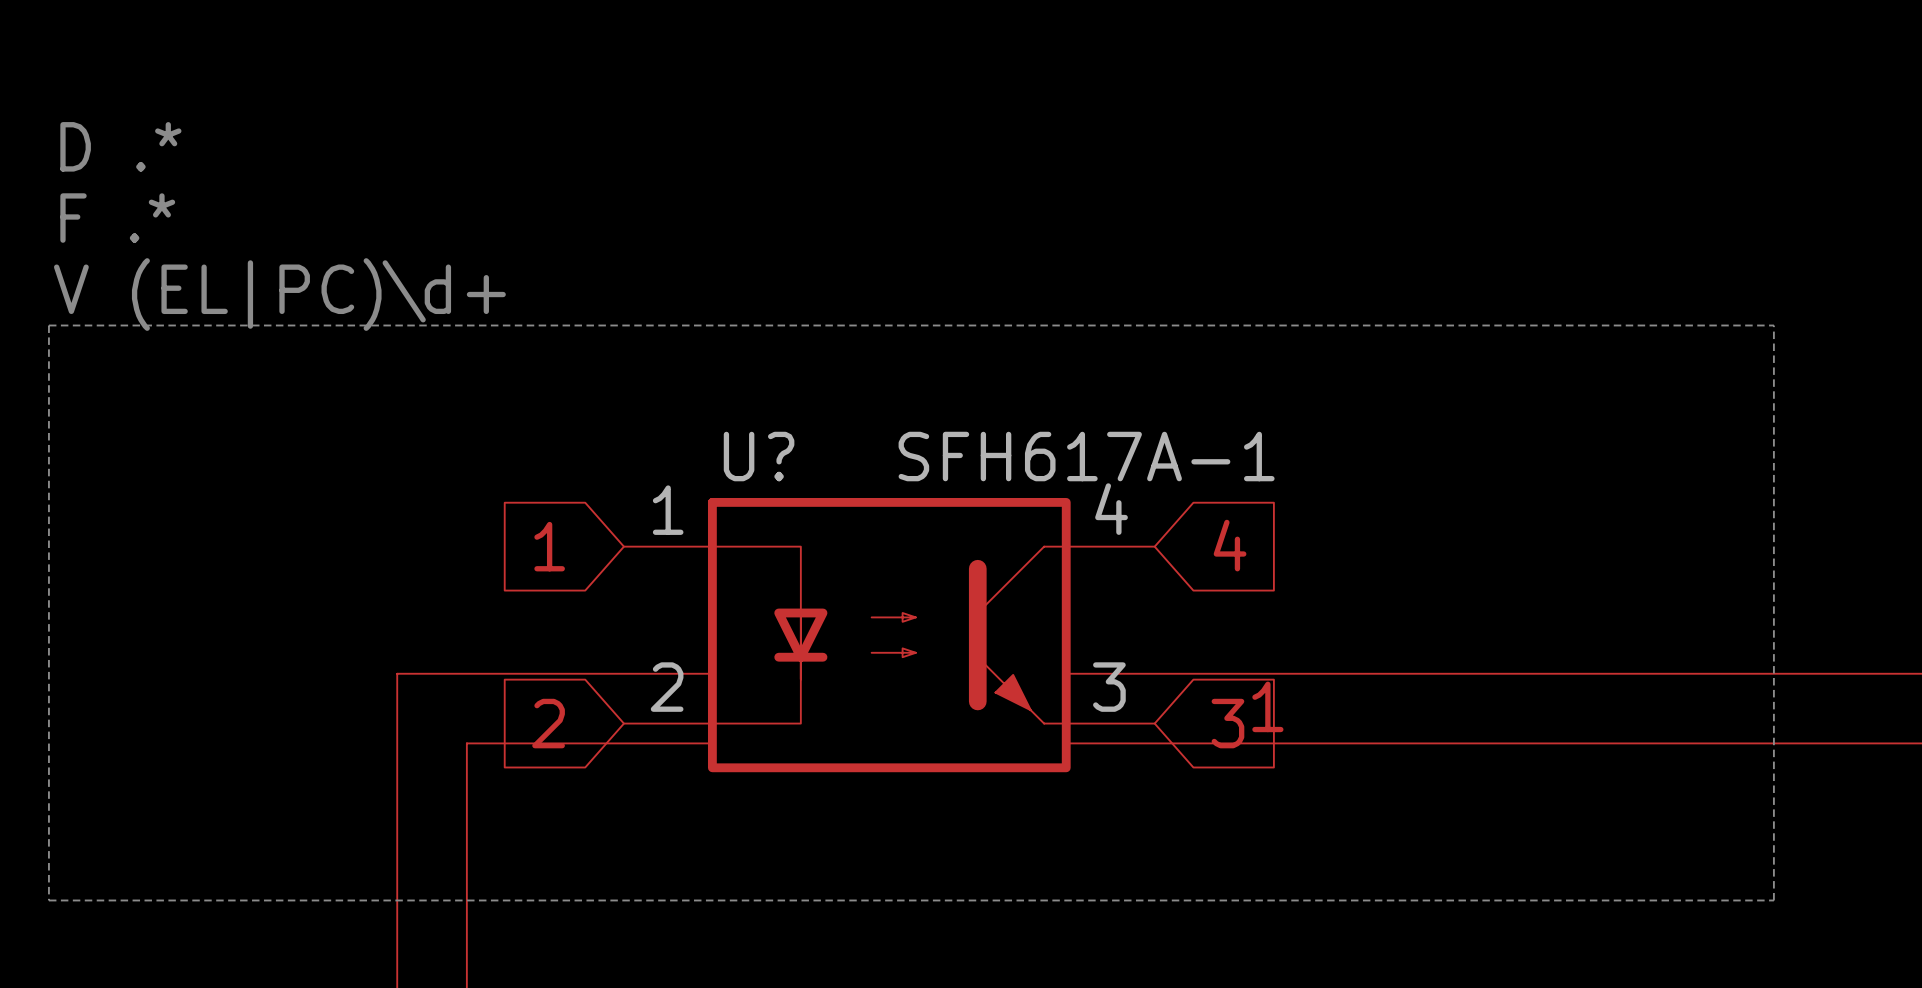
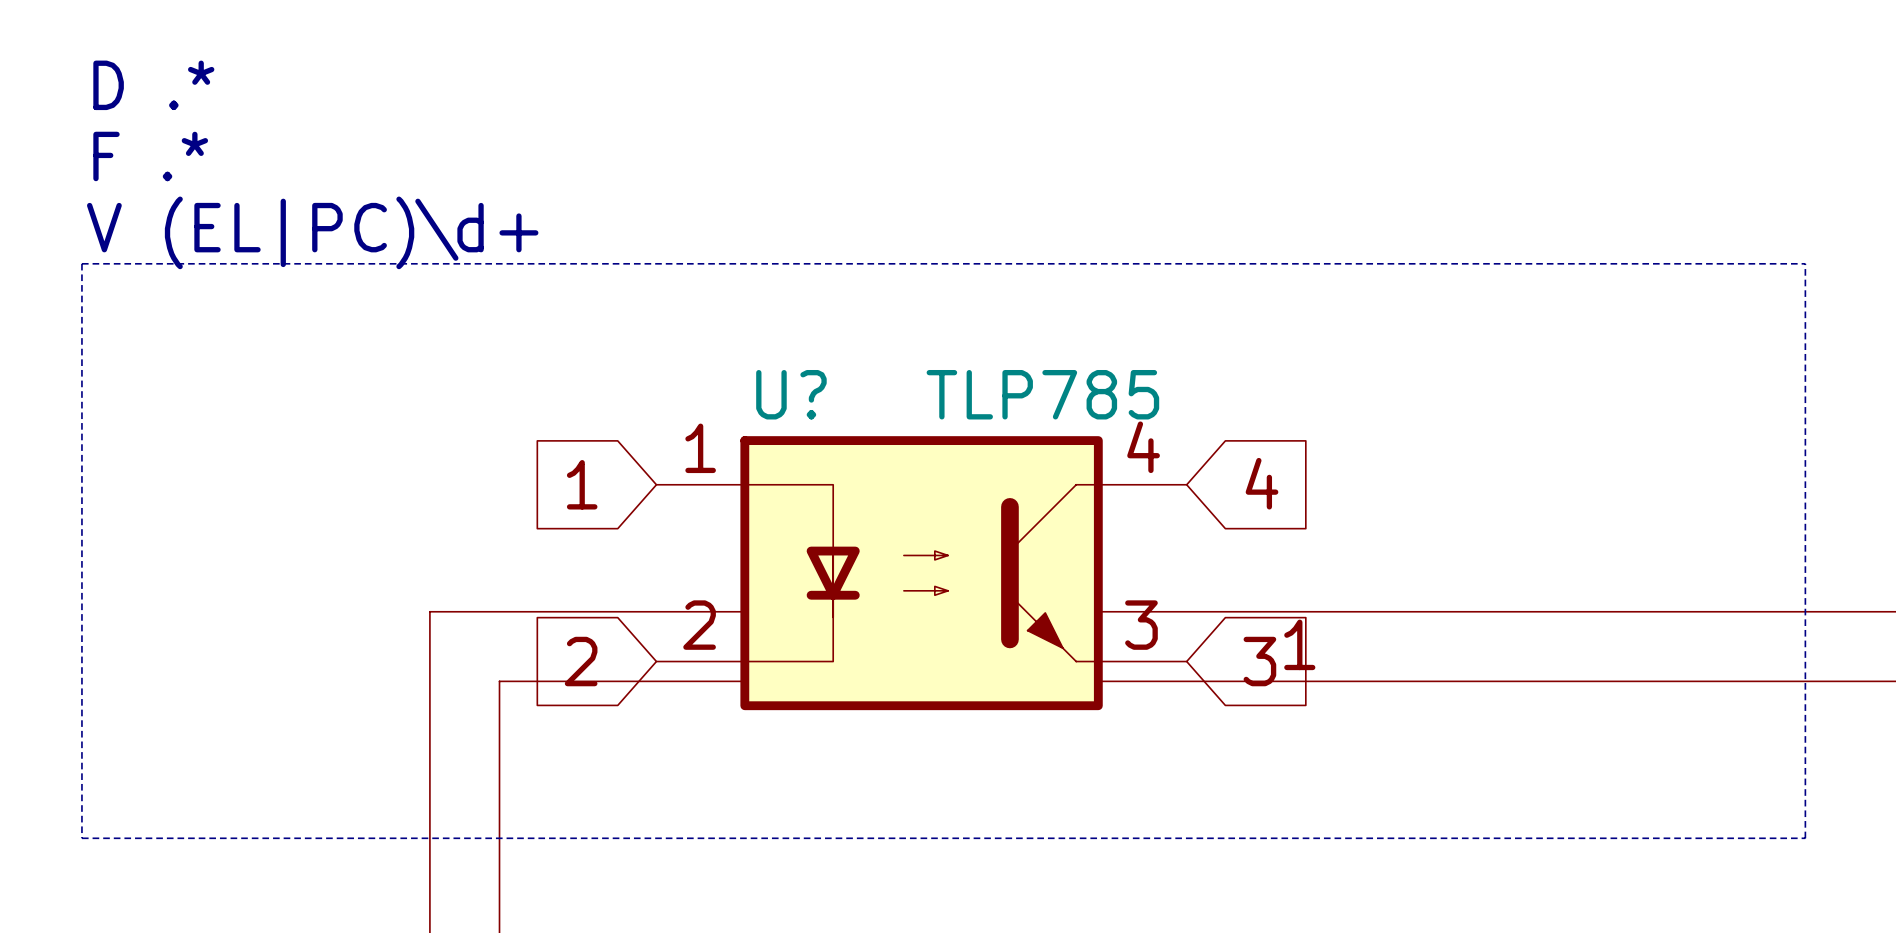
U? value: SFH617A-1 (1086, 456) -> TLP785 (1042, 394)

